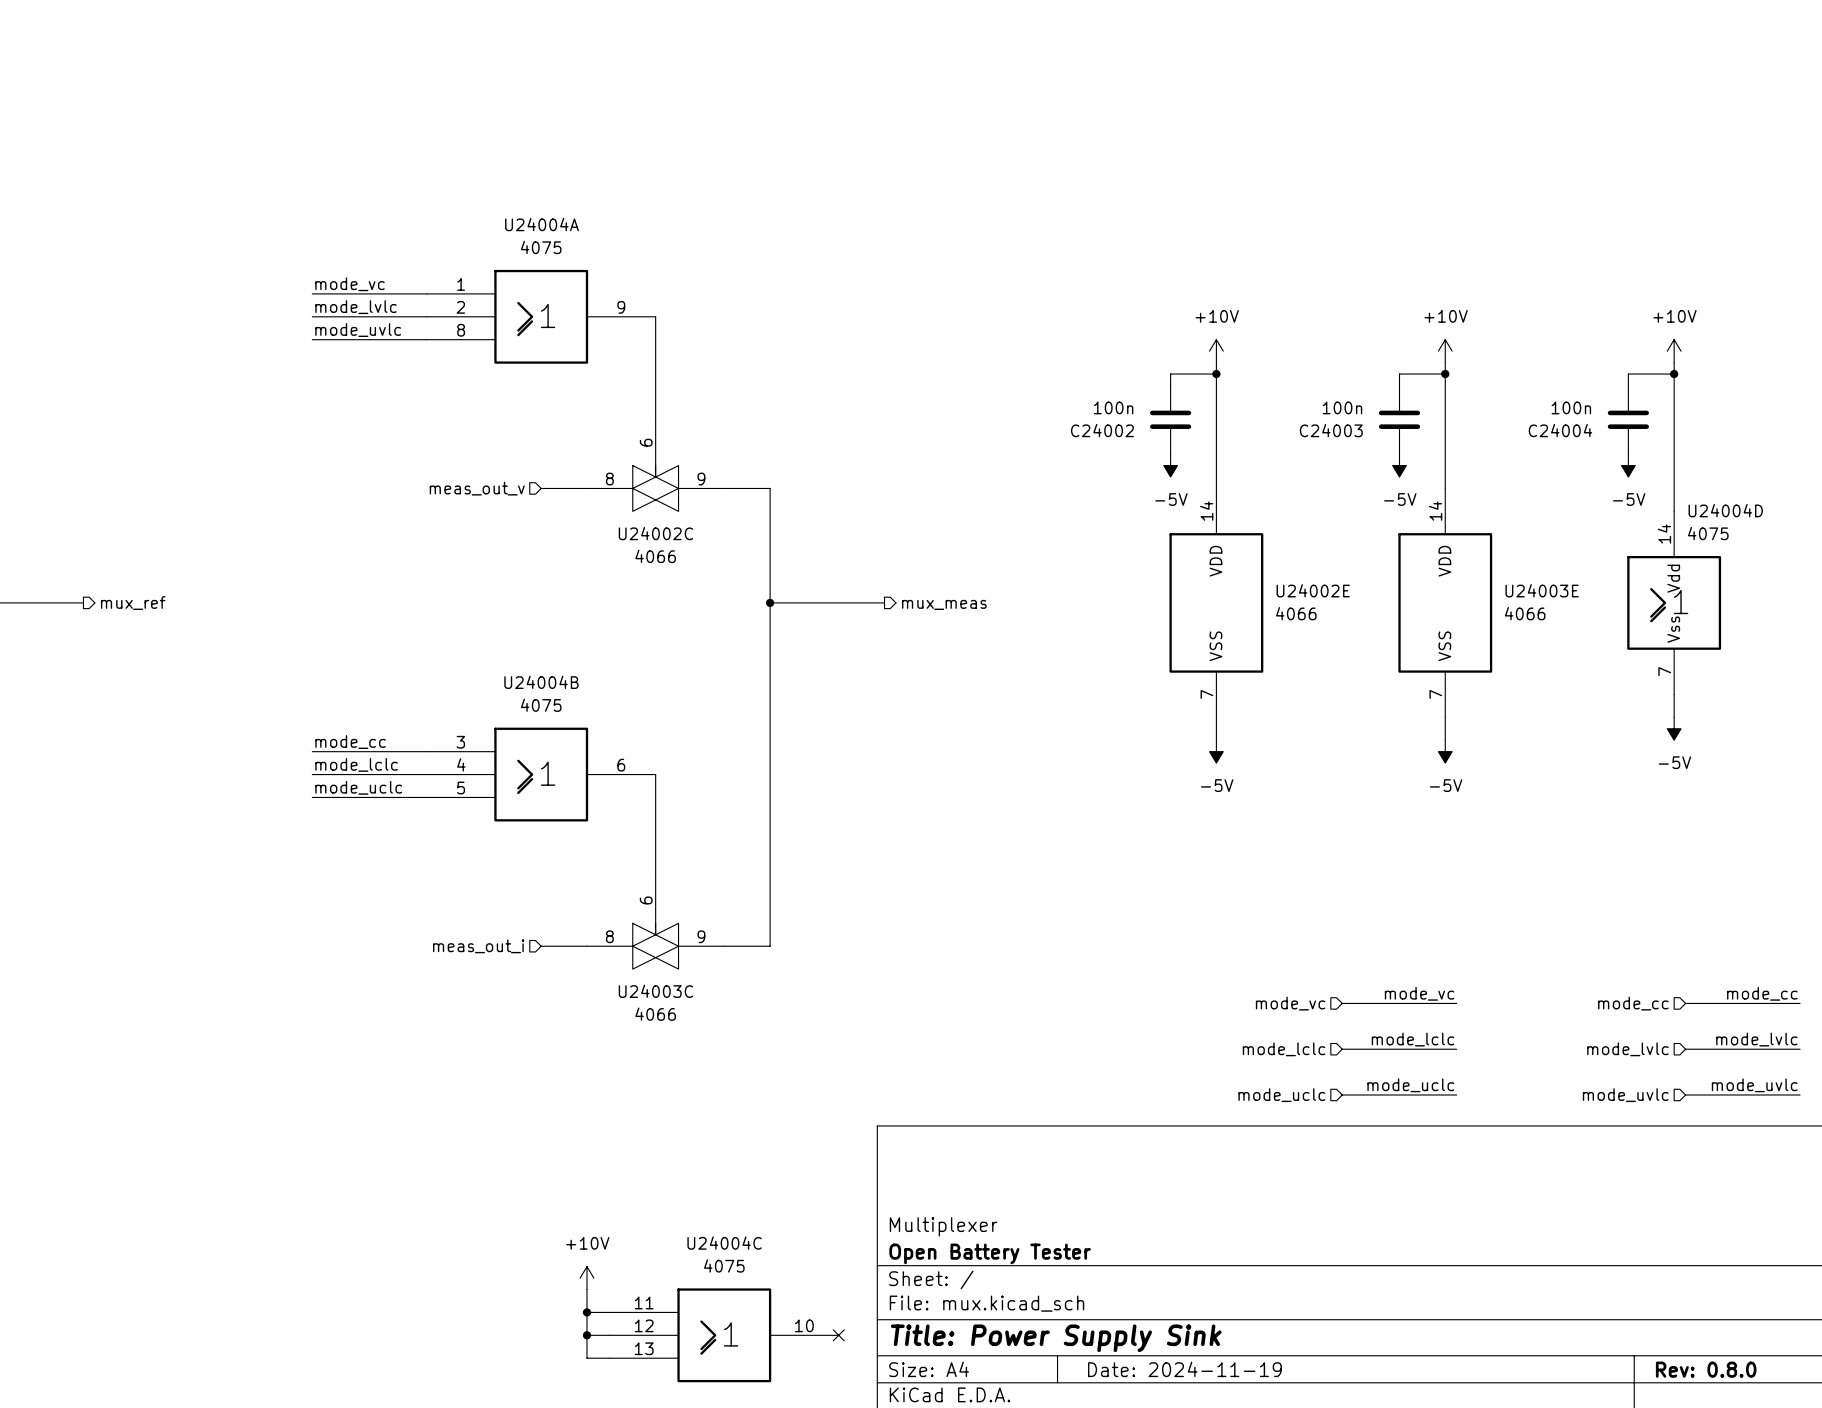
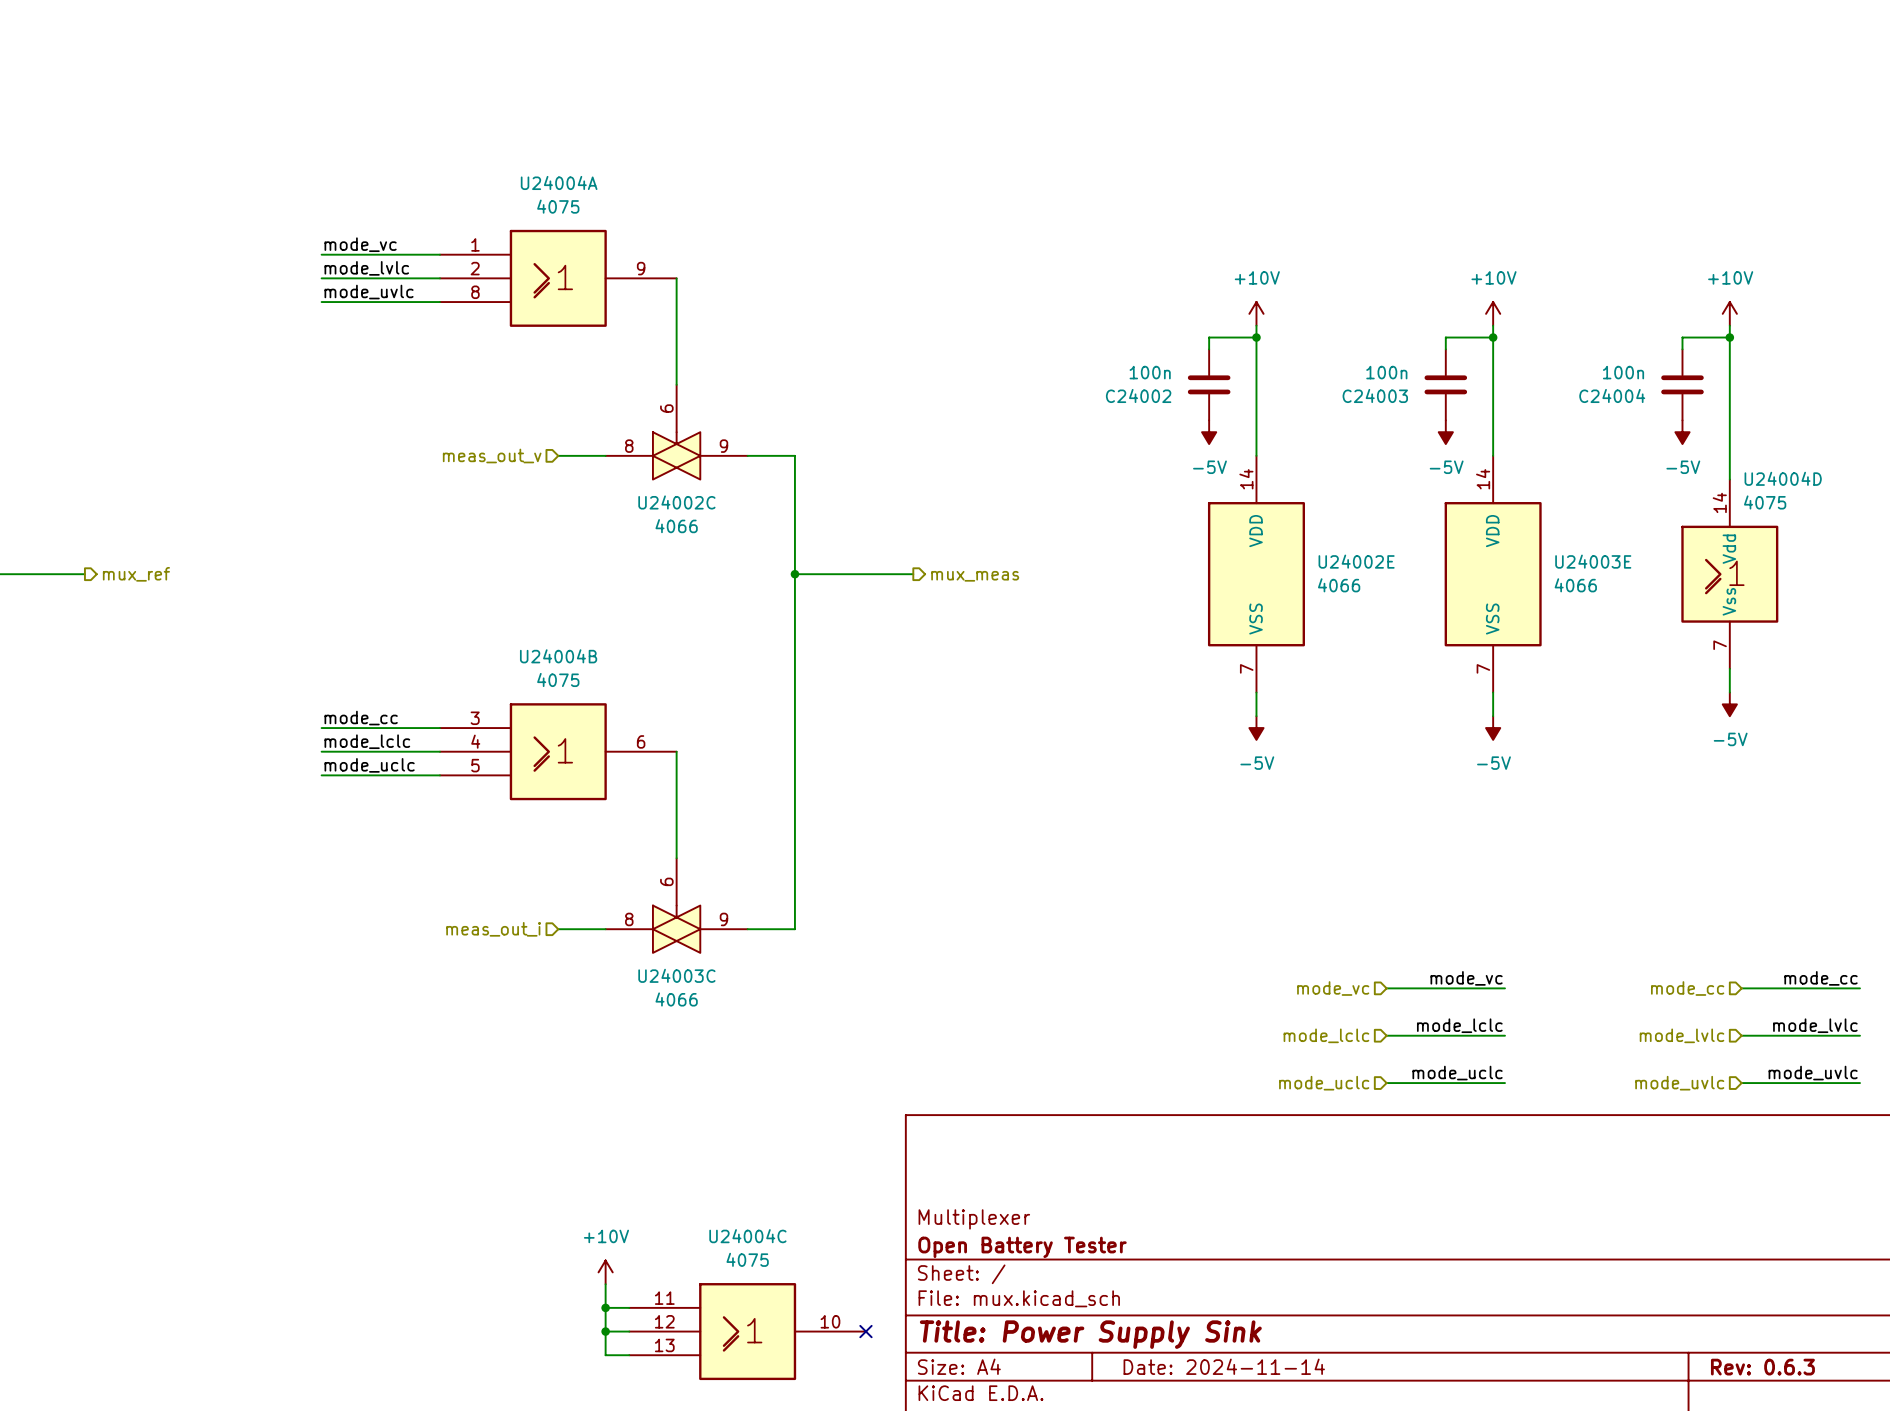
title block: Date: 2024-11-19 (1184, 1369) -> Date: 2024-11-14 (1224, 1366)
title block: Rev: 0.8.0 (1706, 1369) -> Rev: 0.6.3 (1762, 1367)

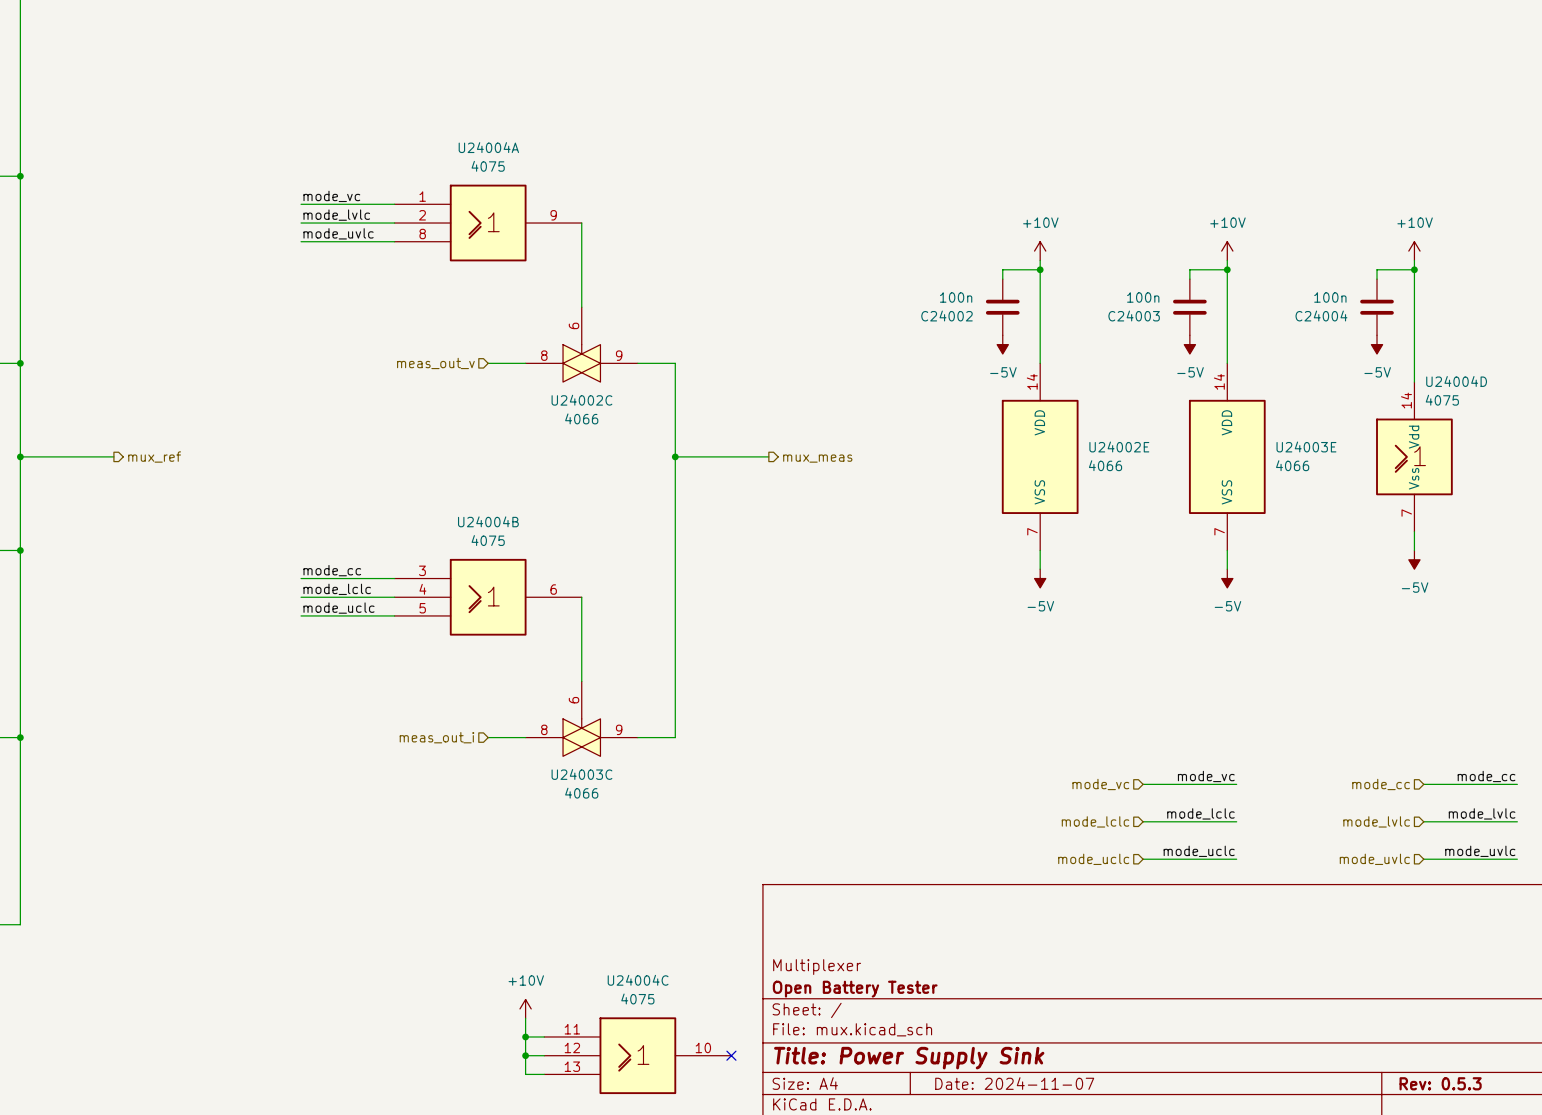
title block: Date: 2024-11-14 (1224, 1366) -> Date: 2024-11-07 (1014, 1083)
title block: Rev: 0.6.3 (1762, 1367) -> Rev: 0.5.3 (1440, 1083)

